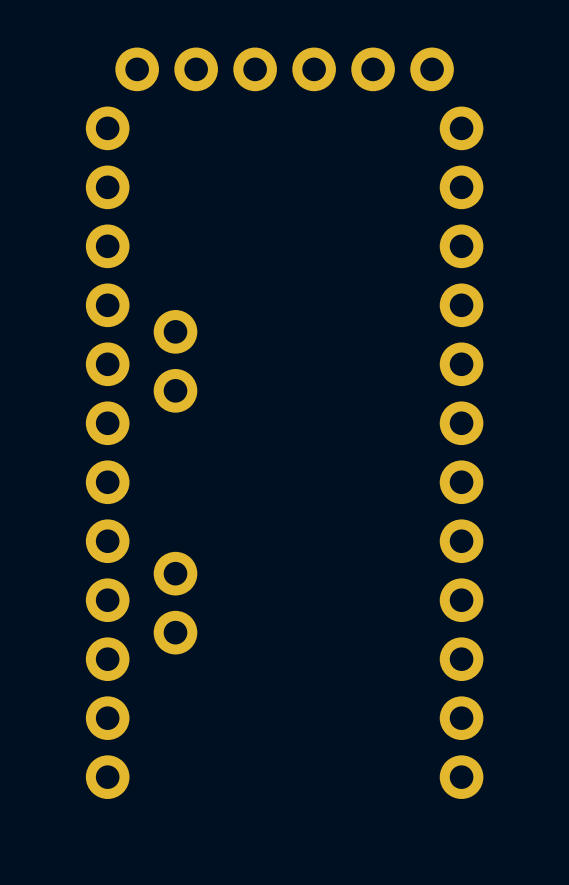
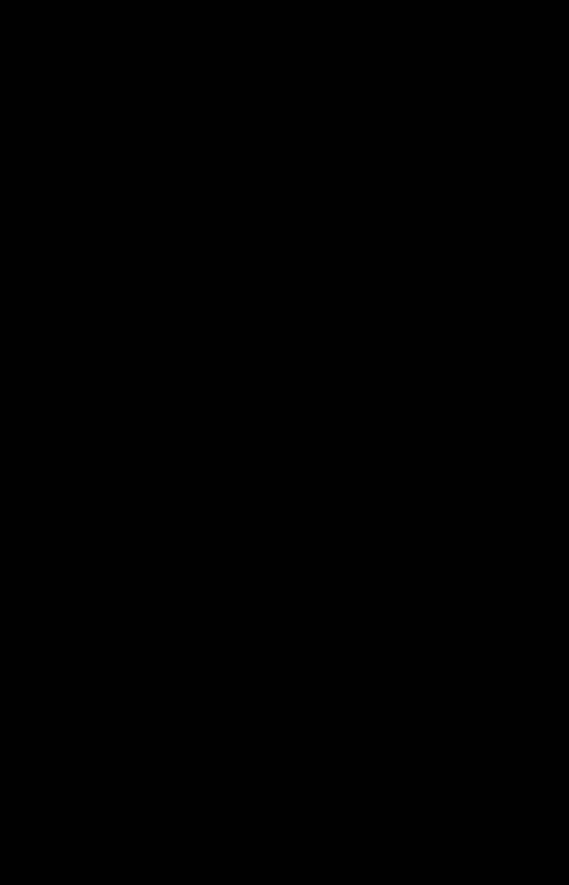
part: (284, 423) -> none

